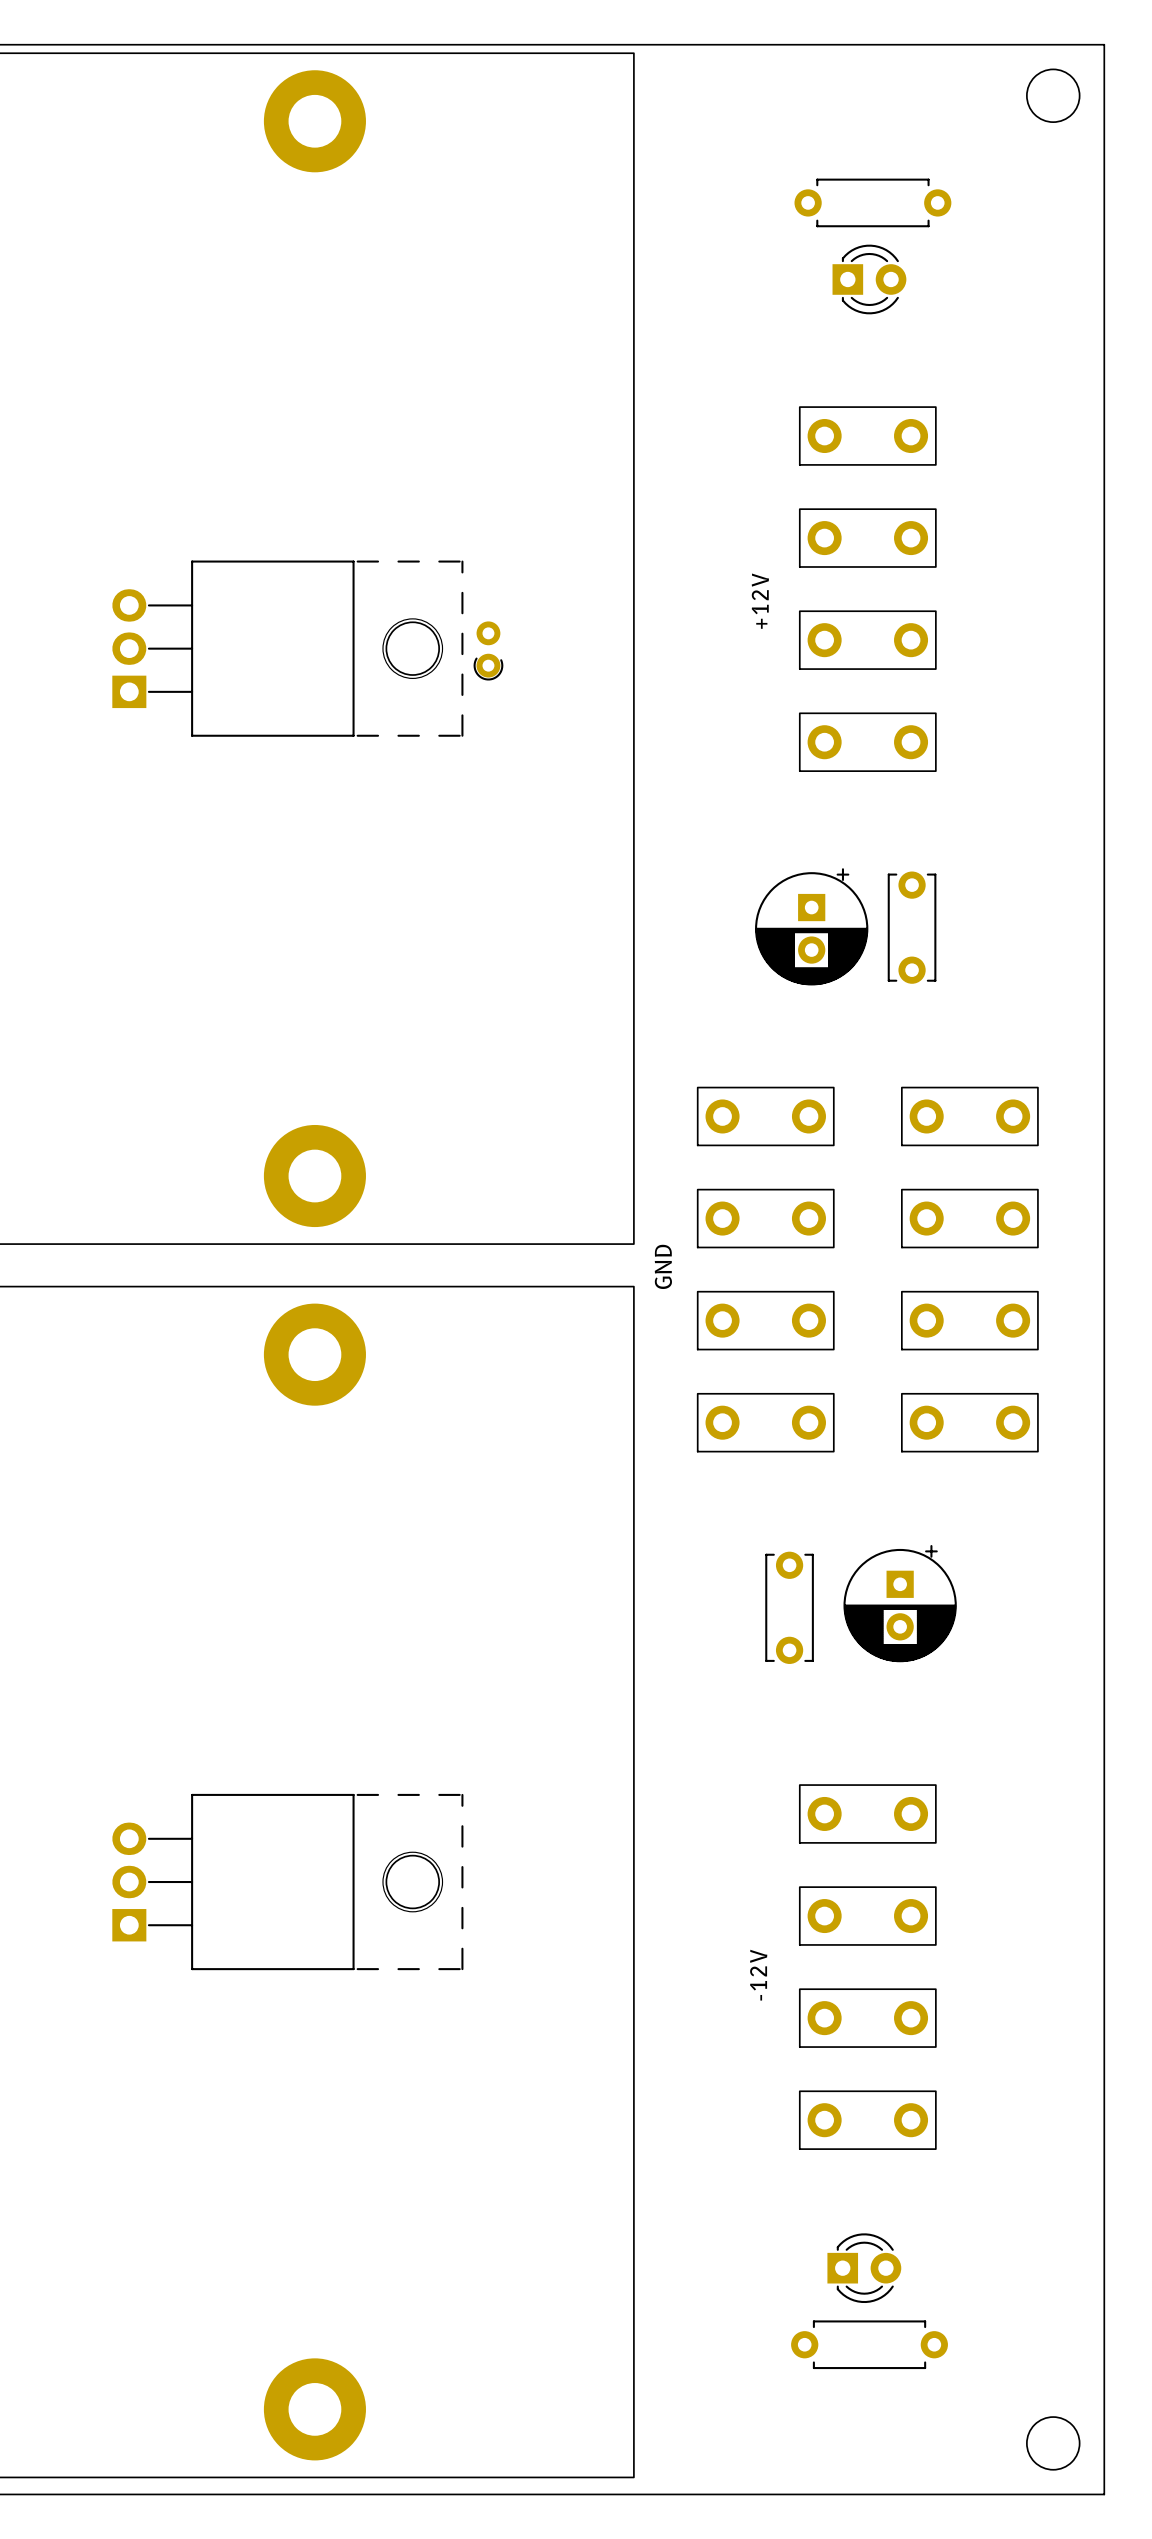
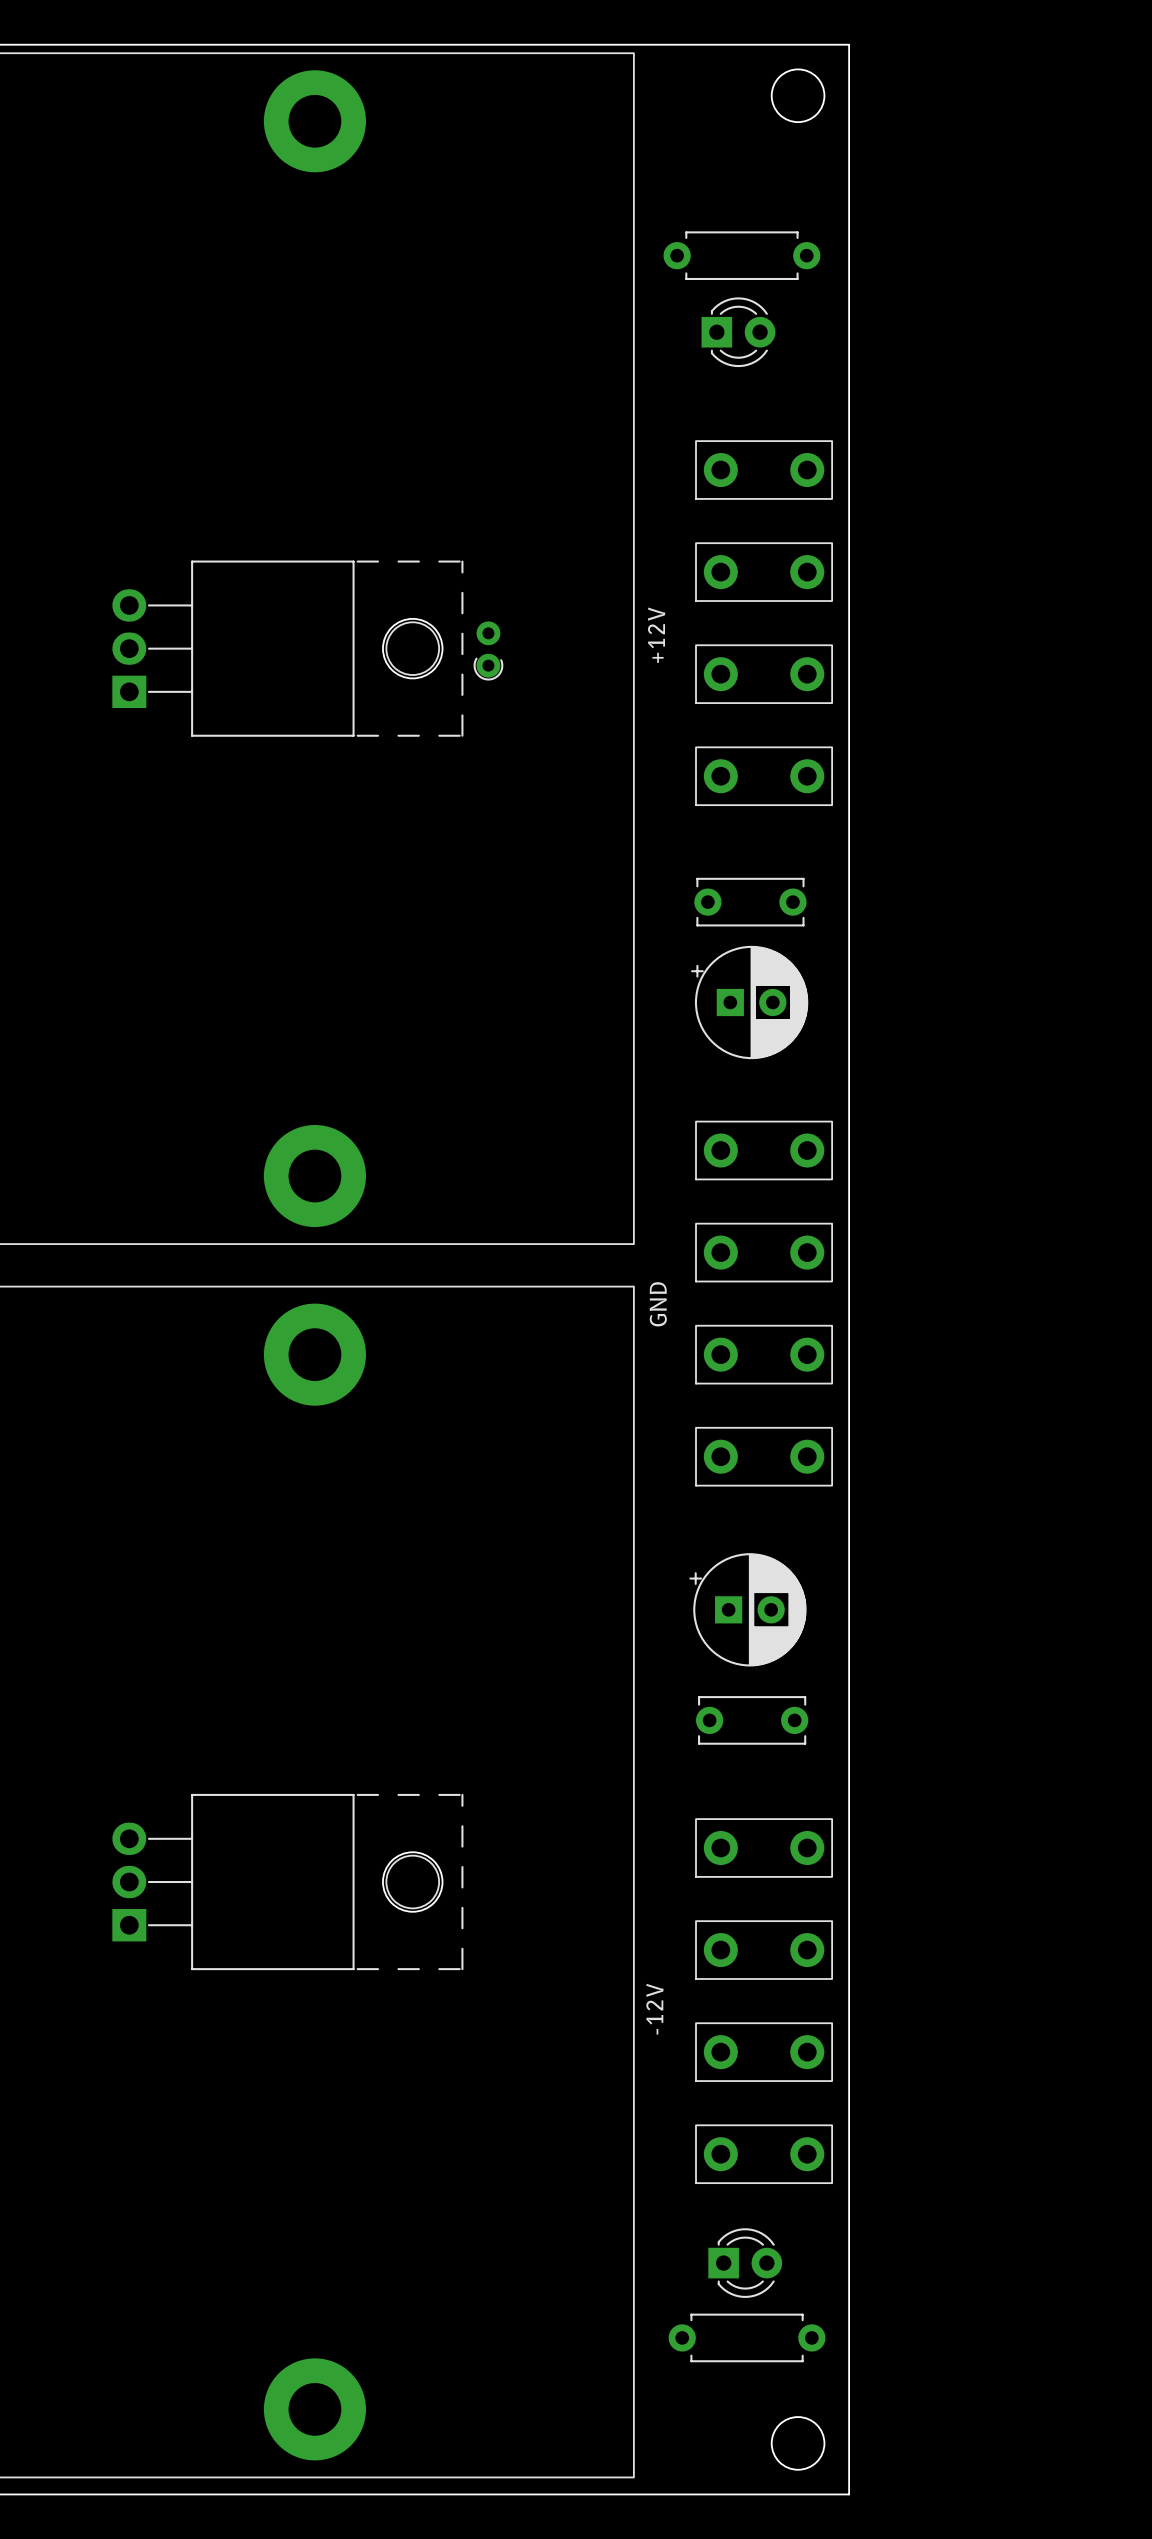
board edge: (849, 44) (1104, 44) (1104, 2494) (849, 2494) -> (849, 44) (849, 2494)
round board edge position: (1053, 95) -> (798, 95)
part position: (872, 202) -> (741, 255)
part position: (869, 279) -> (738, 332)
part: (867, 436) -> none
part: none -> (764, 470)
part: (867, 538) -> none
part: none -> (764, 572)
text position: +12V (760, 601) -> +12V (656, 635)
part: (867, 640) -> none
part: none -> (764, 674)
part: (867, 742) -> none
part: none -> (764, 776)
part rotation: 0° (811, 926) -> 90° counterclockwise (749, 1002)
part position: (811, 926) -> (749, 1002)
part rotation: 0° (912, 927) -> 90° clockwise (750, 902)
part position: (912, 927) -> (750, 902)
part: (765, 1116) -> none
part: (969, 1116) -> none
part: none -> (764, 1150)
part: (765, 1218) -> none
part: (969, 1218) -> none
part: none -> (764, 1252)
text position: GND (663, 1266) -> GND (658, 1304)
part: (765, 1320) -> none
part: (969, 1320) -> none
part: none -> (764, 1354)
part: (765, 1422) -> none
part: (969, 1422) -> none
part: none -> (764, 1456)
part rotation: 0° (900, 1603) -> 90° counterclockwise (747, 1609)
part position: (900, 1603) -> (747, 1609)
part rotation: 0° (789, 1607) -> 90° clockwise (752, 1720)
part position: (789, 1607) -> (752, 1720)
part: (867, 1813) -> none
part: none -> (764, 1847)
part: (867, 1916) -> none
part: none -> (764, 1950)
text position: -12V (758, 1975) -> -12V (654, 2009)
part: (867, 2018) -> none
part: none -> (764, 2052)
part: (867, 2120) -> none
part: none -> (764, 2154)
part position: (864, 2268) -> (745, 2263)
part position: (869, 2344) -> (747, 2337)
round board edge position: (1053, 2443) -> (798, 2443)

